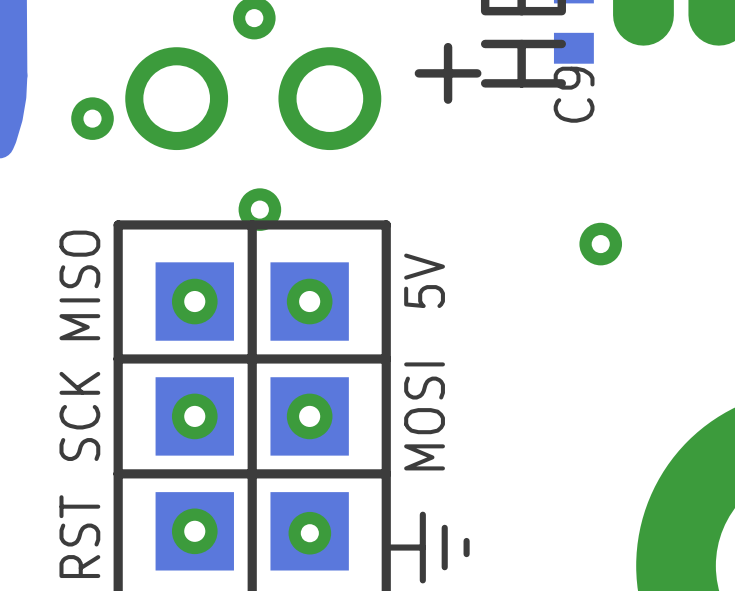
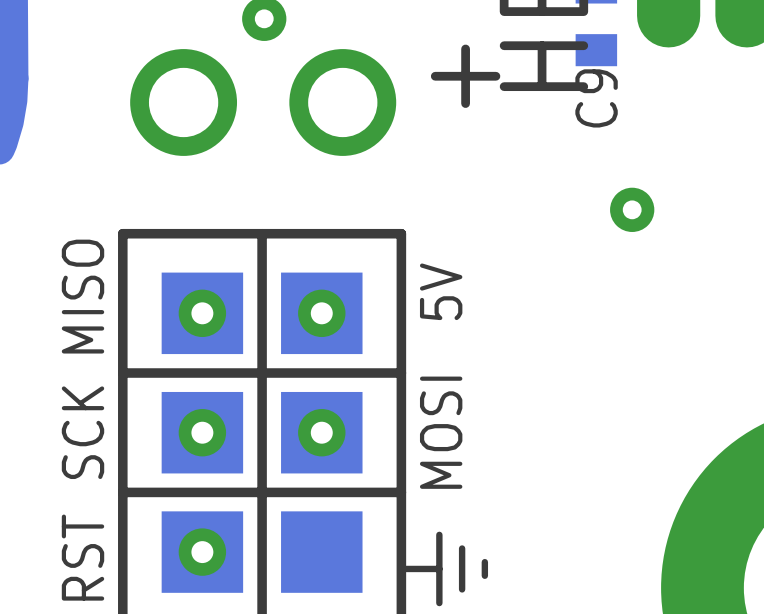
via: (92, 118) -> none
via: (259, 209) -> none
via position: (600, 244) -> (632, 209)
via: (309, 533) -> none

